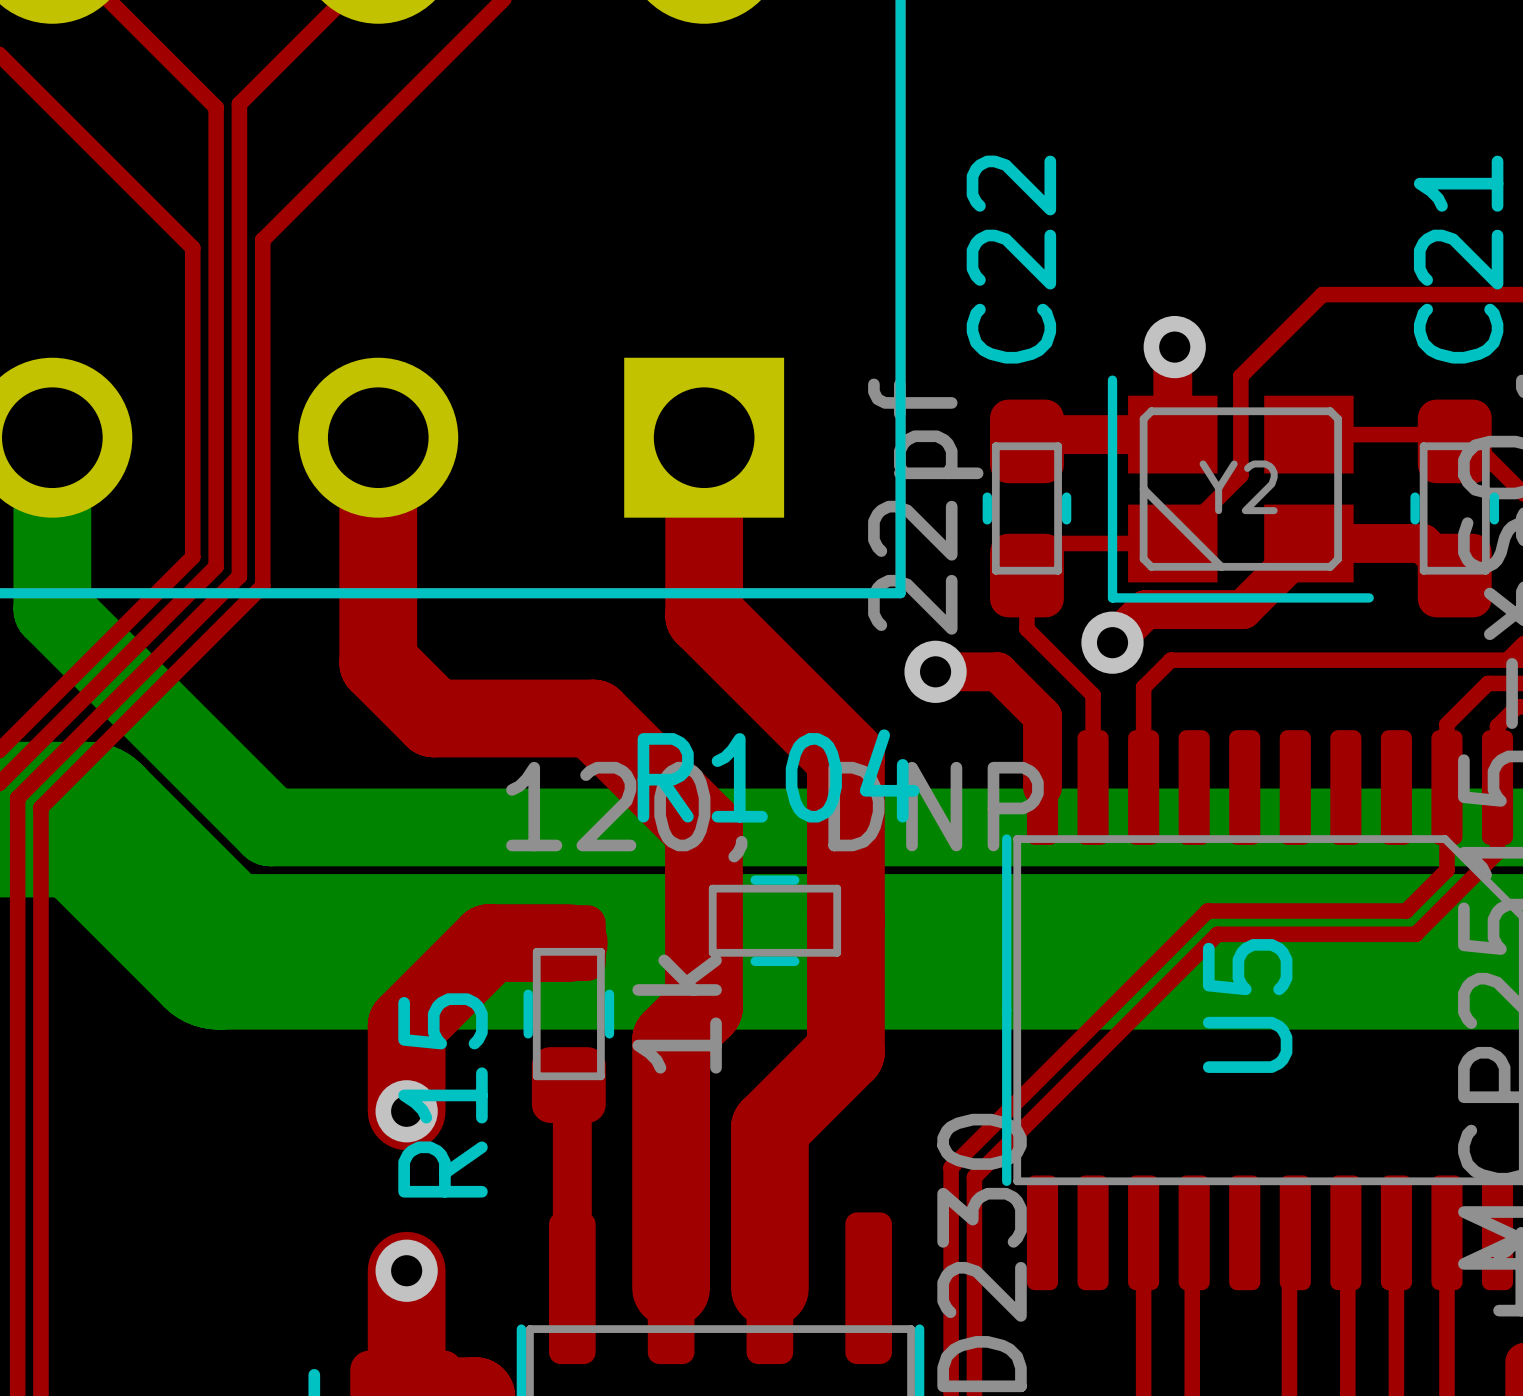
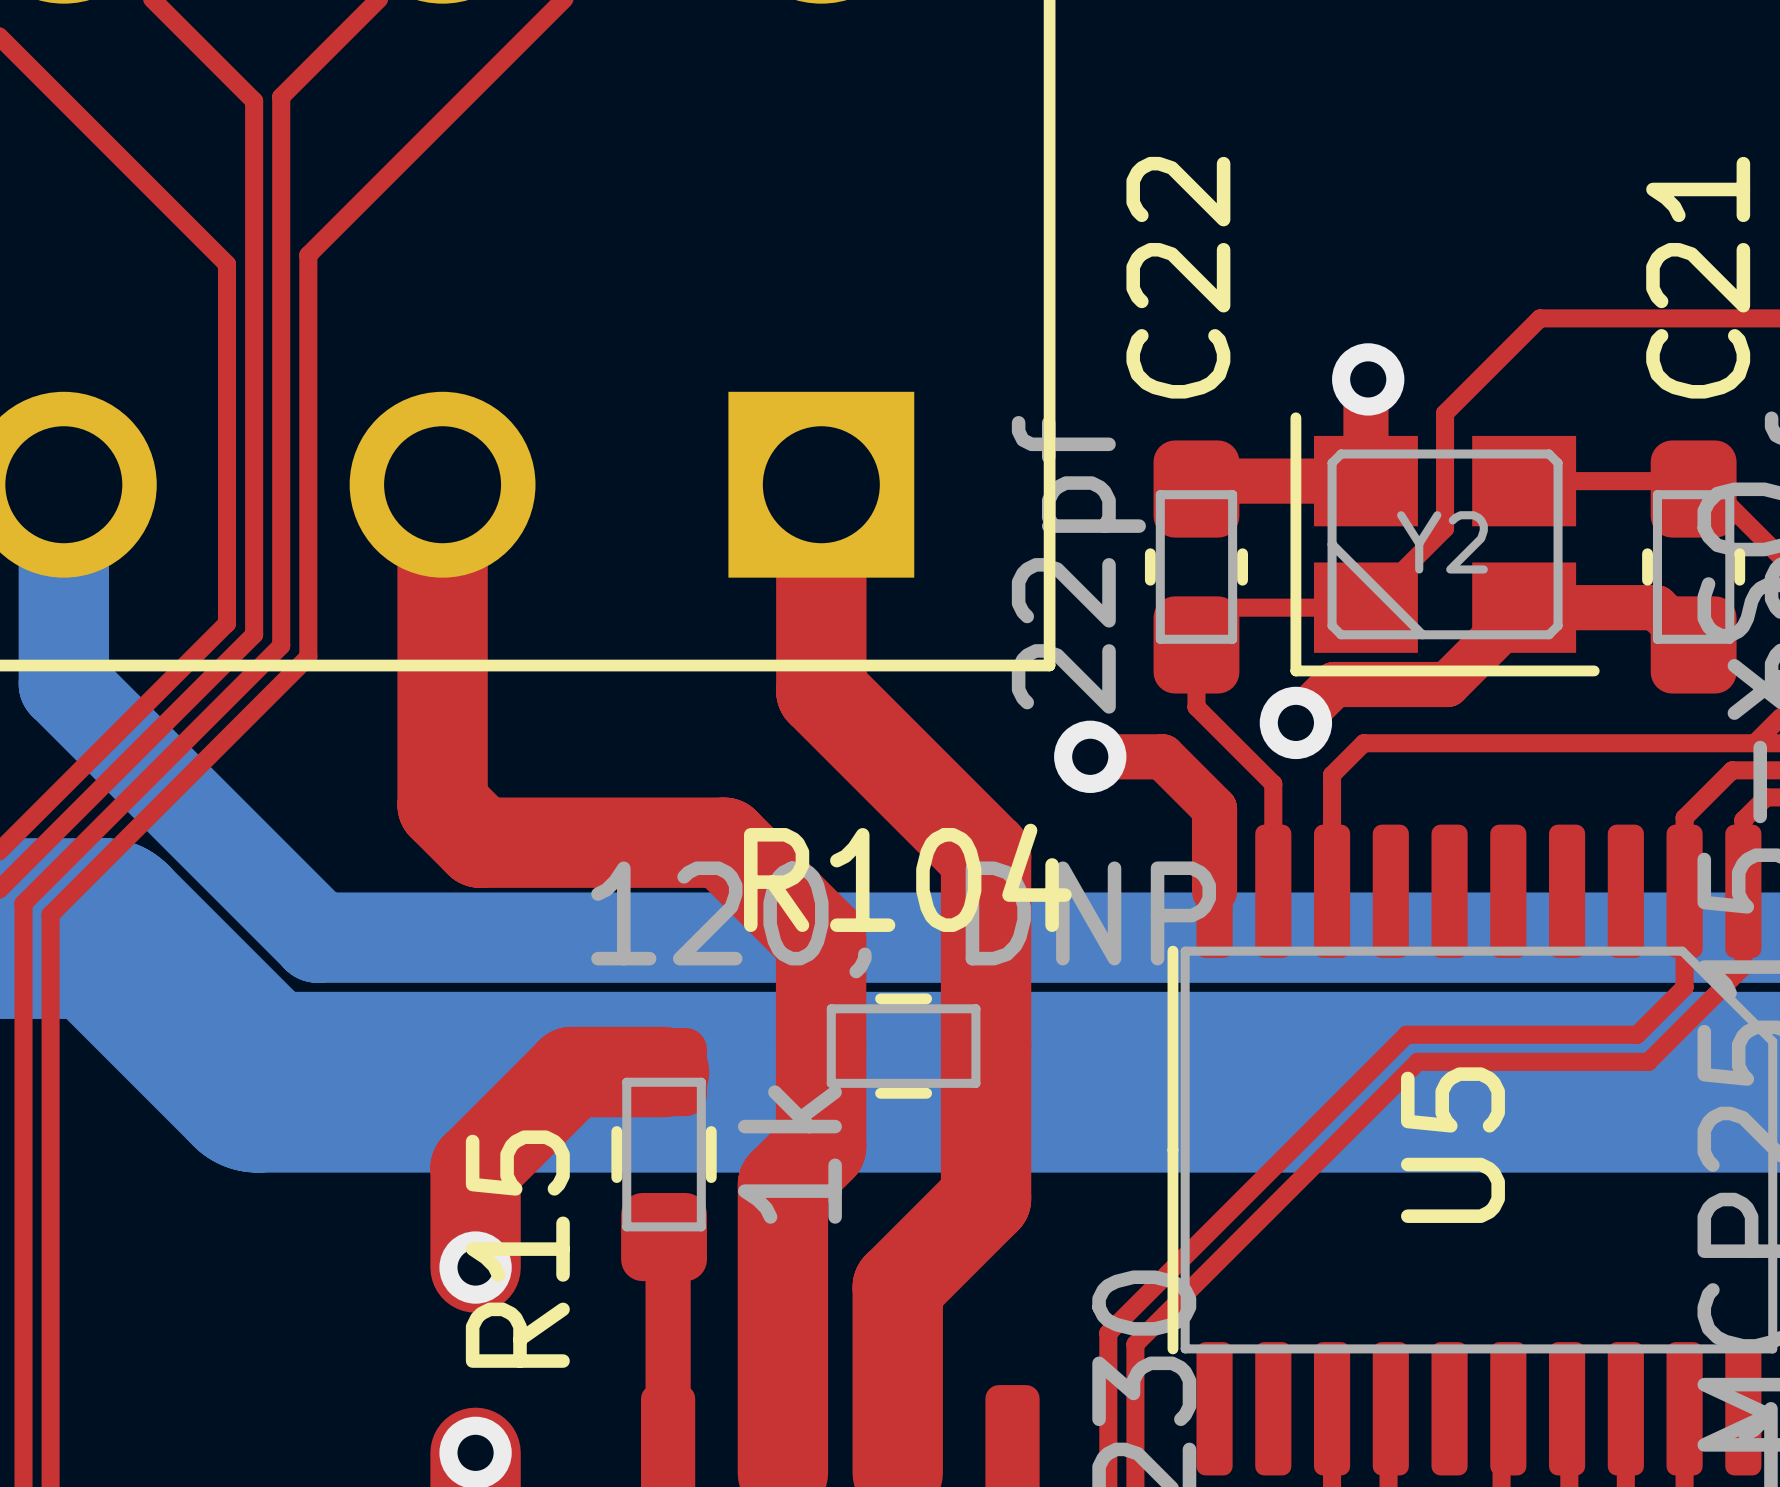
top track: (378, 662) (433, 718) (593, 718) (620, 745) -> (442, 746) (442, 805) (480, 842) (724, 842)

